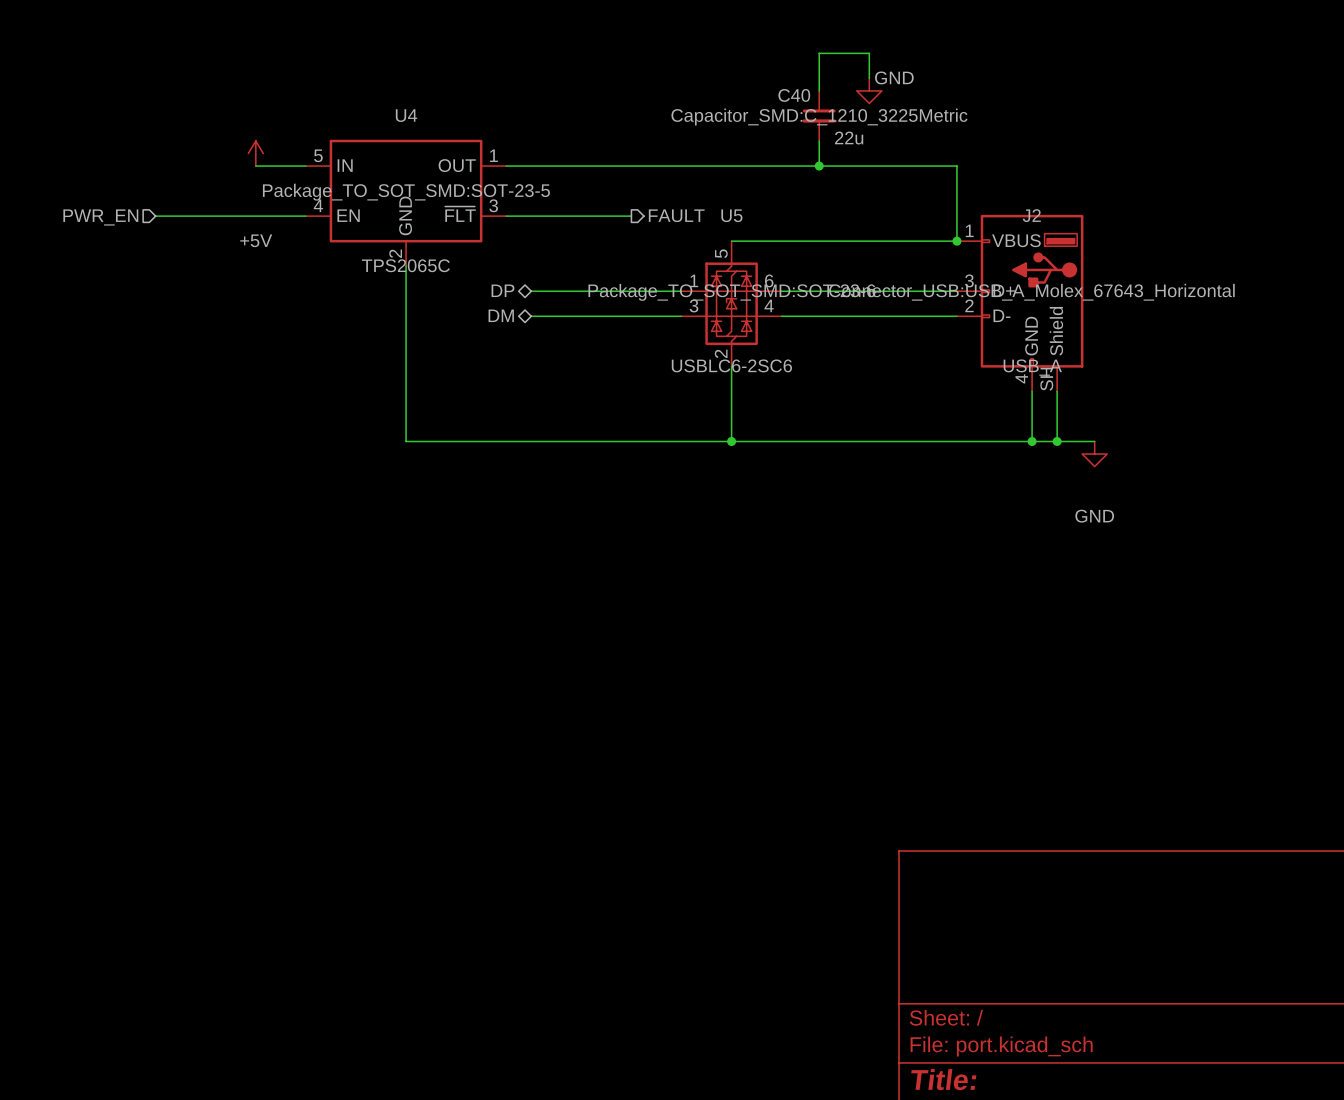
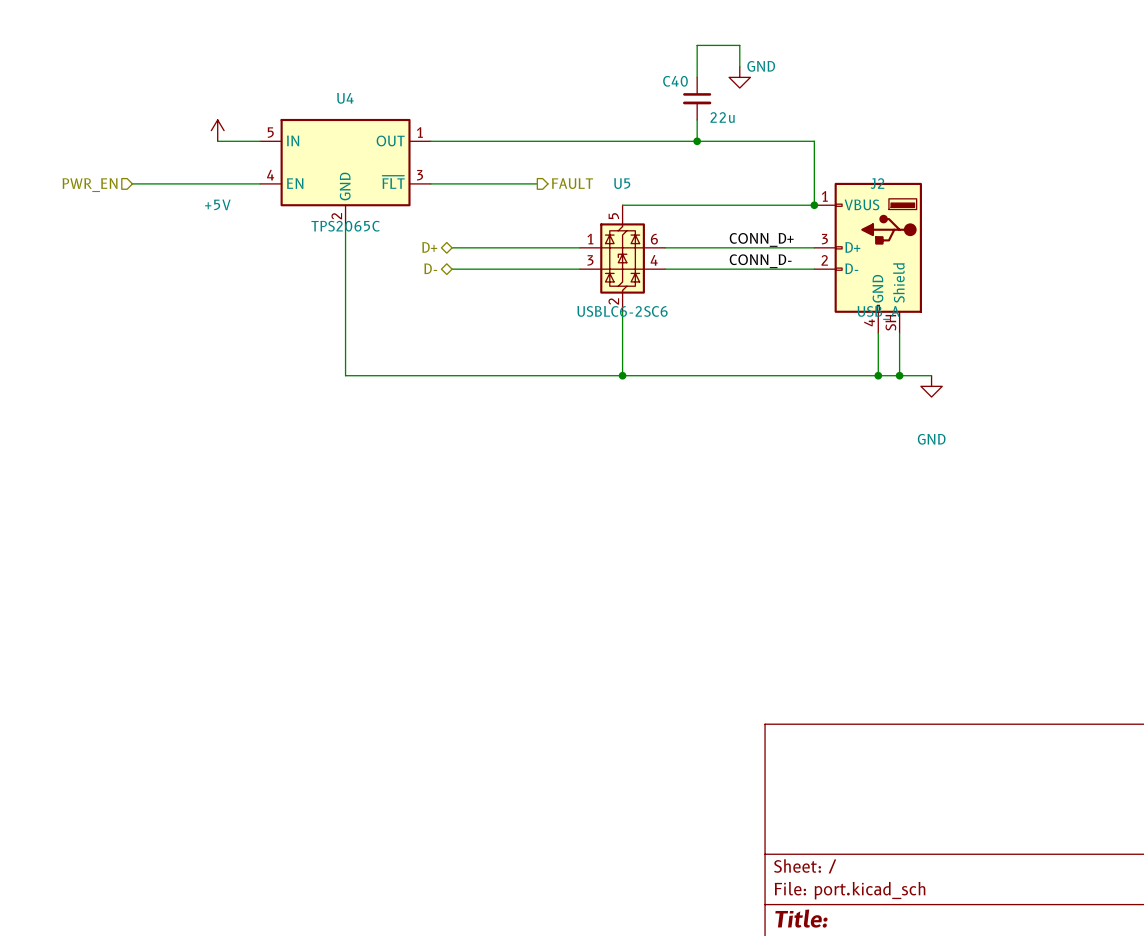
C40 text: Capacitor_SMD:C_1210_3225Metric (819, 117) -> none
U4 text: Package_TO_SOT_SMD:SOT-23-5 (406, 192) -> none
label: none -> CONN_D+ (761, 239)
hierarchical label: DP (502, 290) -> D+ (429, 247)
U5 text: Package_TO_SOT_SMD:SOT-23-6 (731, 292) -> none
J2 text: Connector_USB:USB_A_Molex_67643_Horizontal (1031, 292) -> none
label: none -> CONN_D- (760, 261)
hierarchical label: DM (501, 315) -> D- (430, 268)

